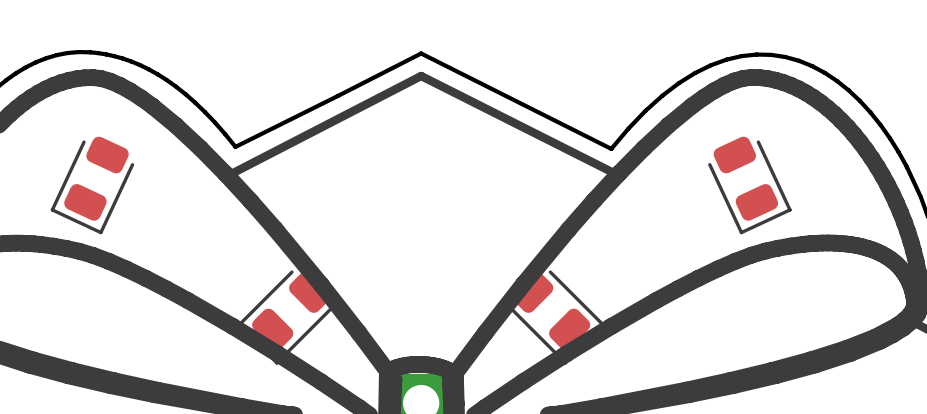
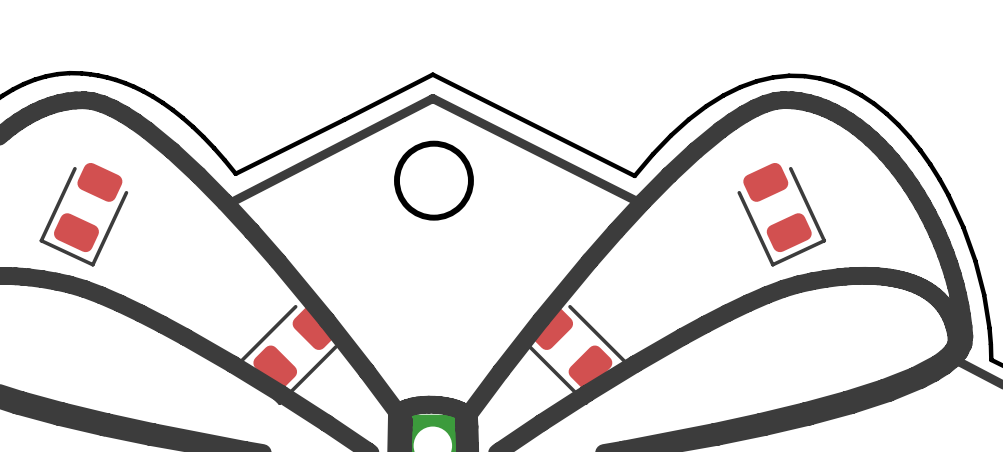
round board edge: none -> [394, 140, 474, 221]

